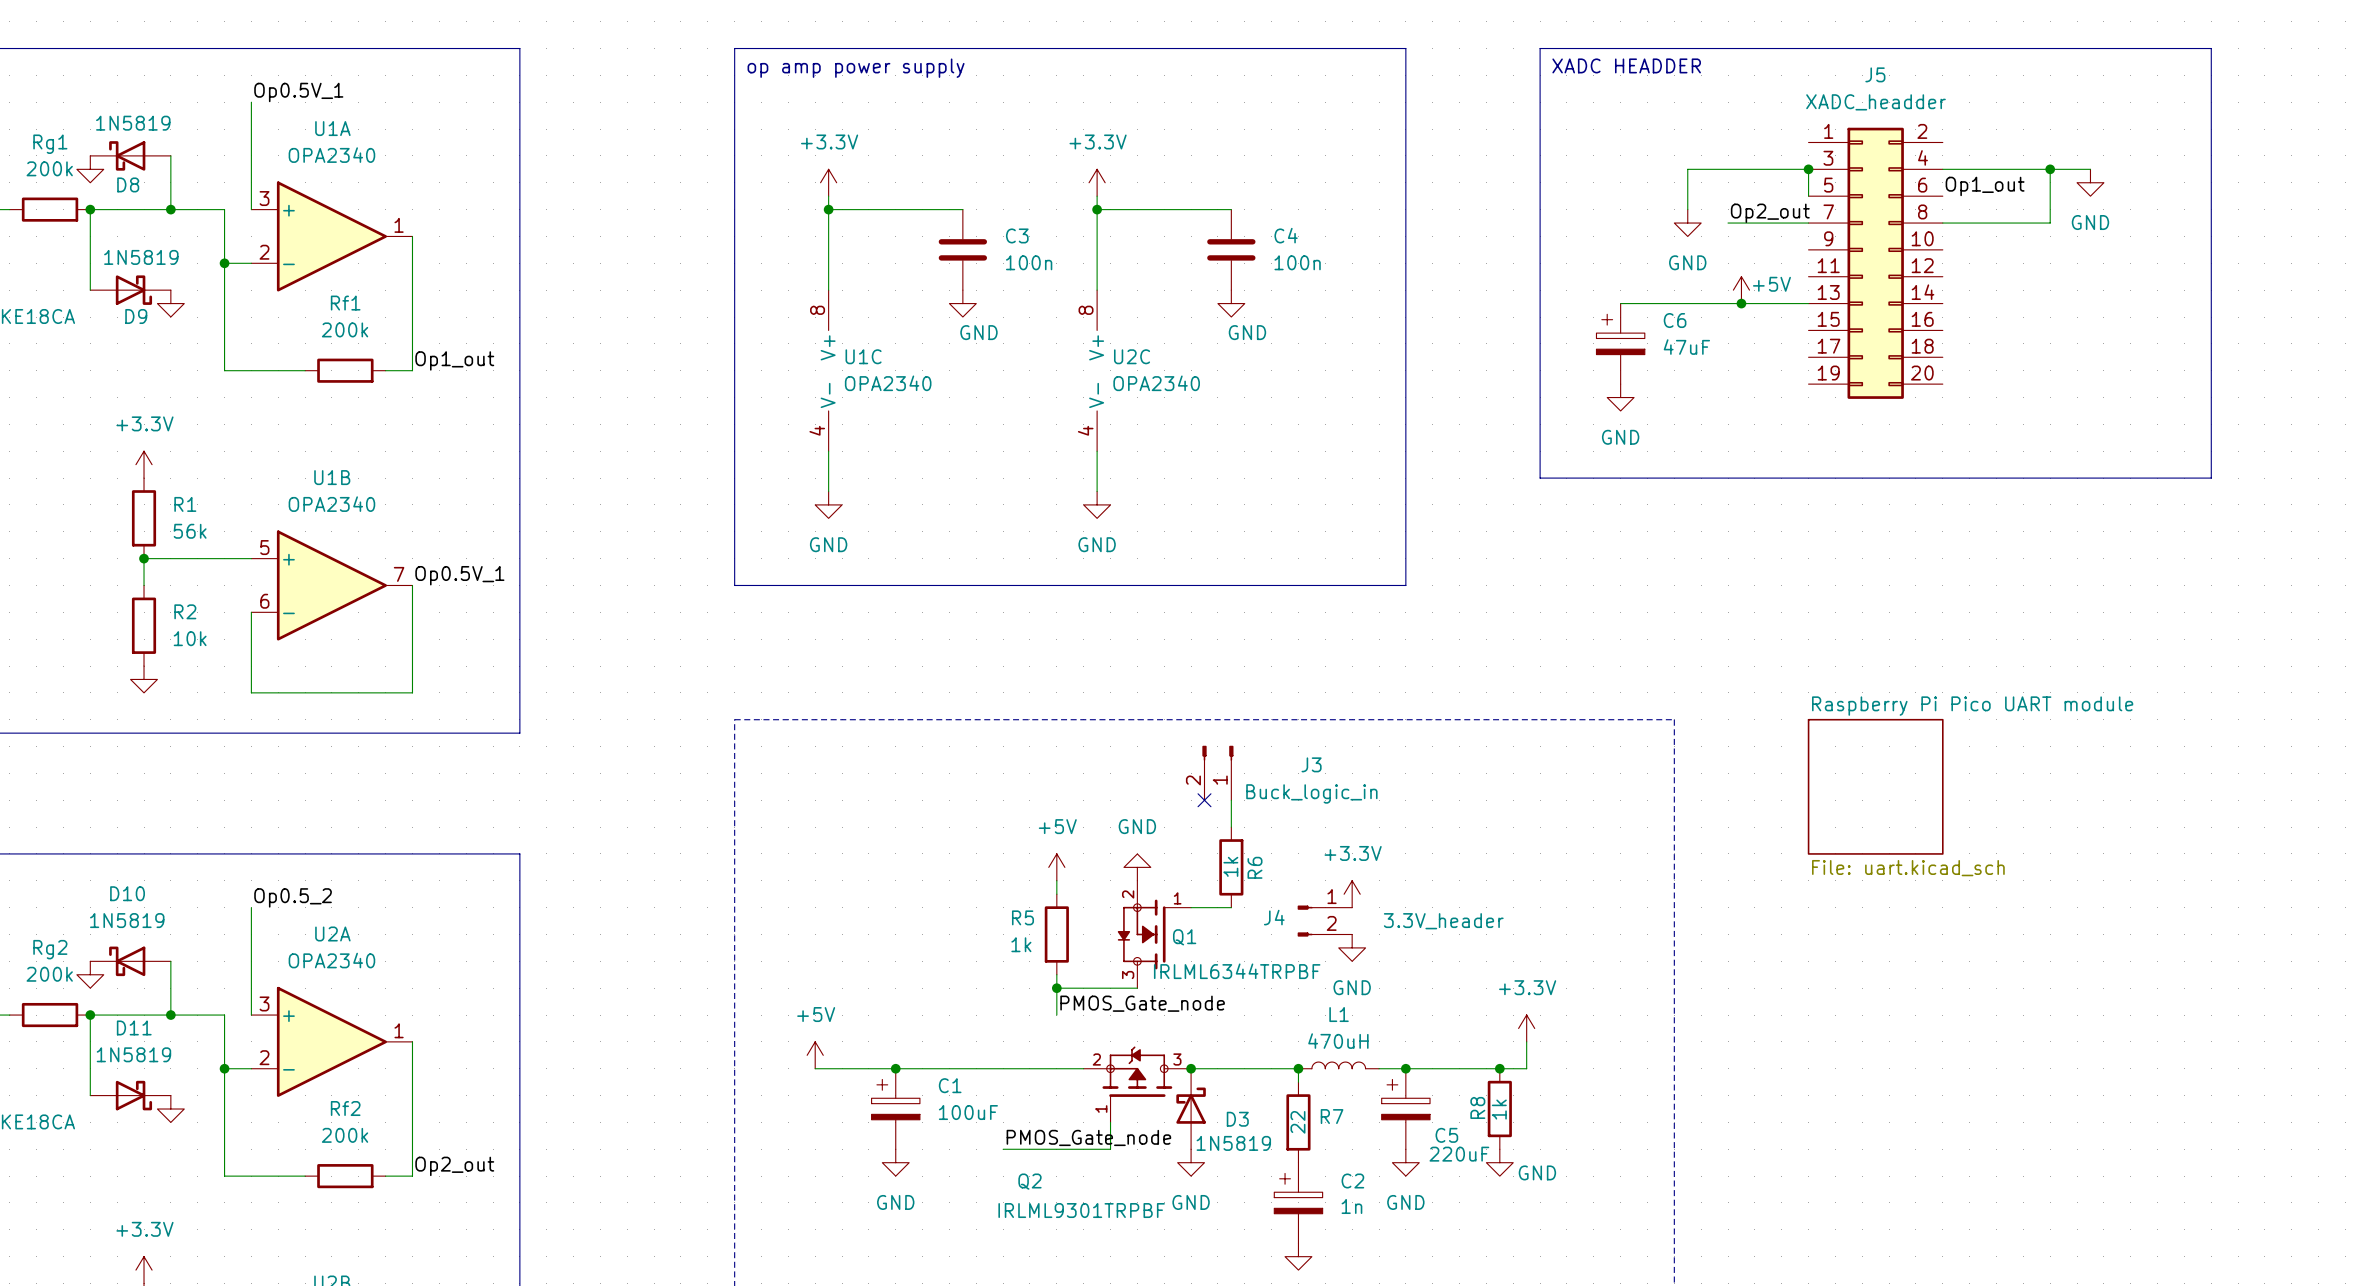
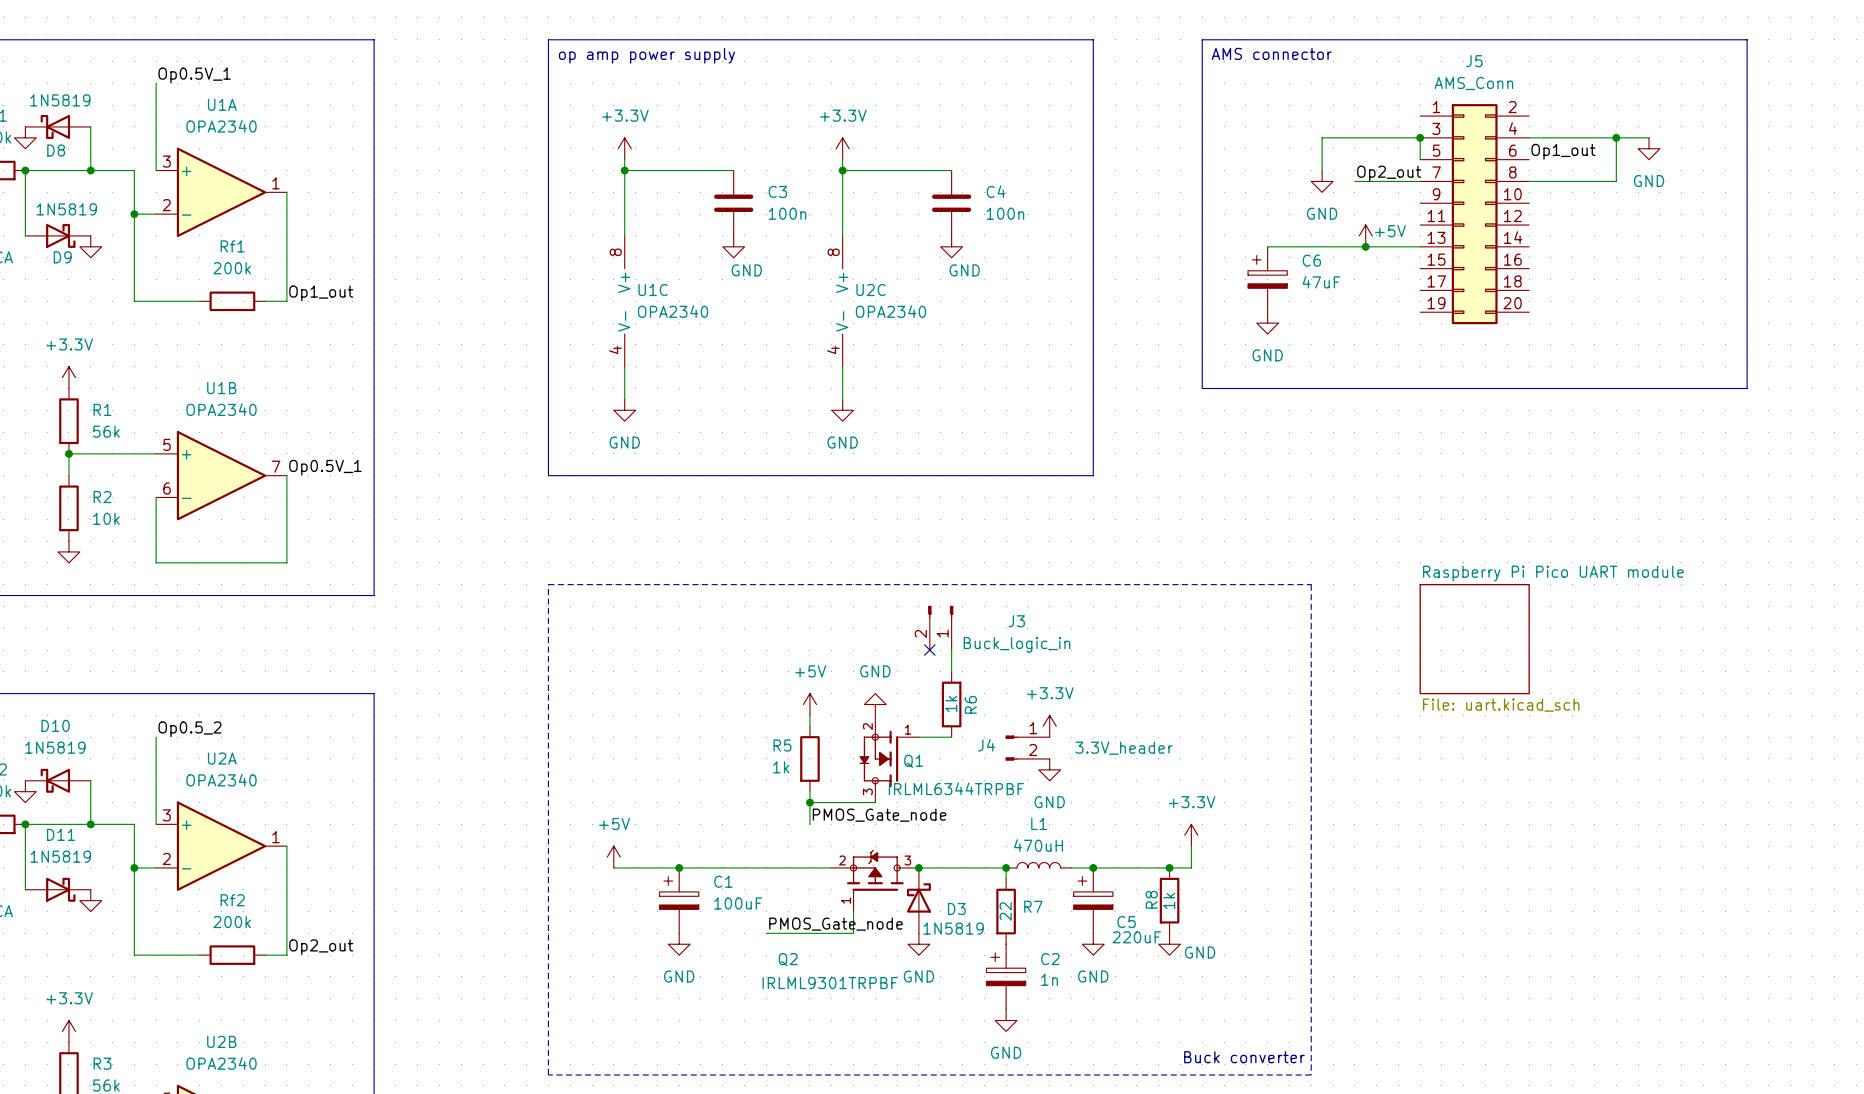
text: XADC HEADDER (1626, 65) -> AMS connector (1271, 53)
J5 value: XADC_headder (1876, 102) -> AMS_Conn (1473, 83)

